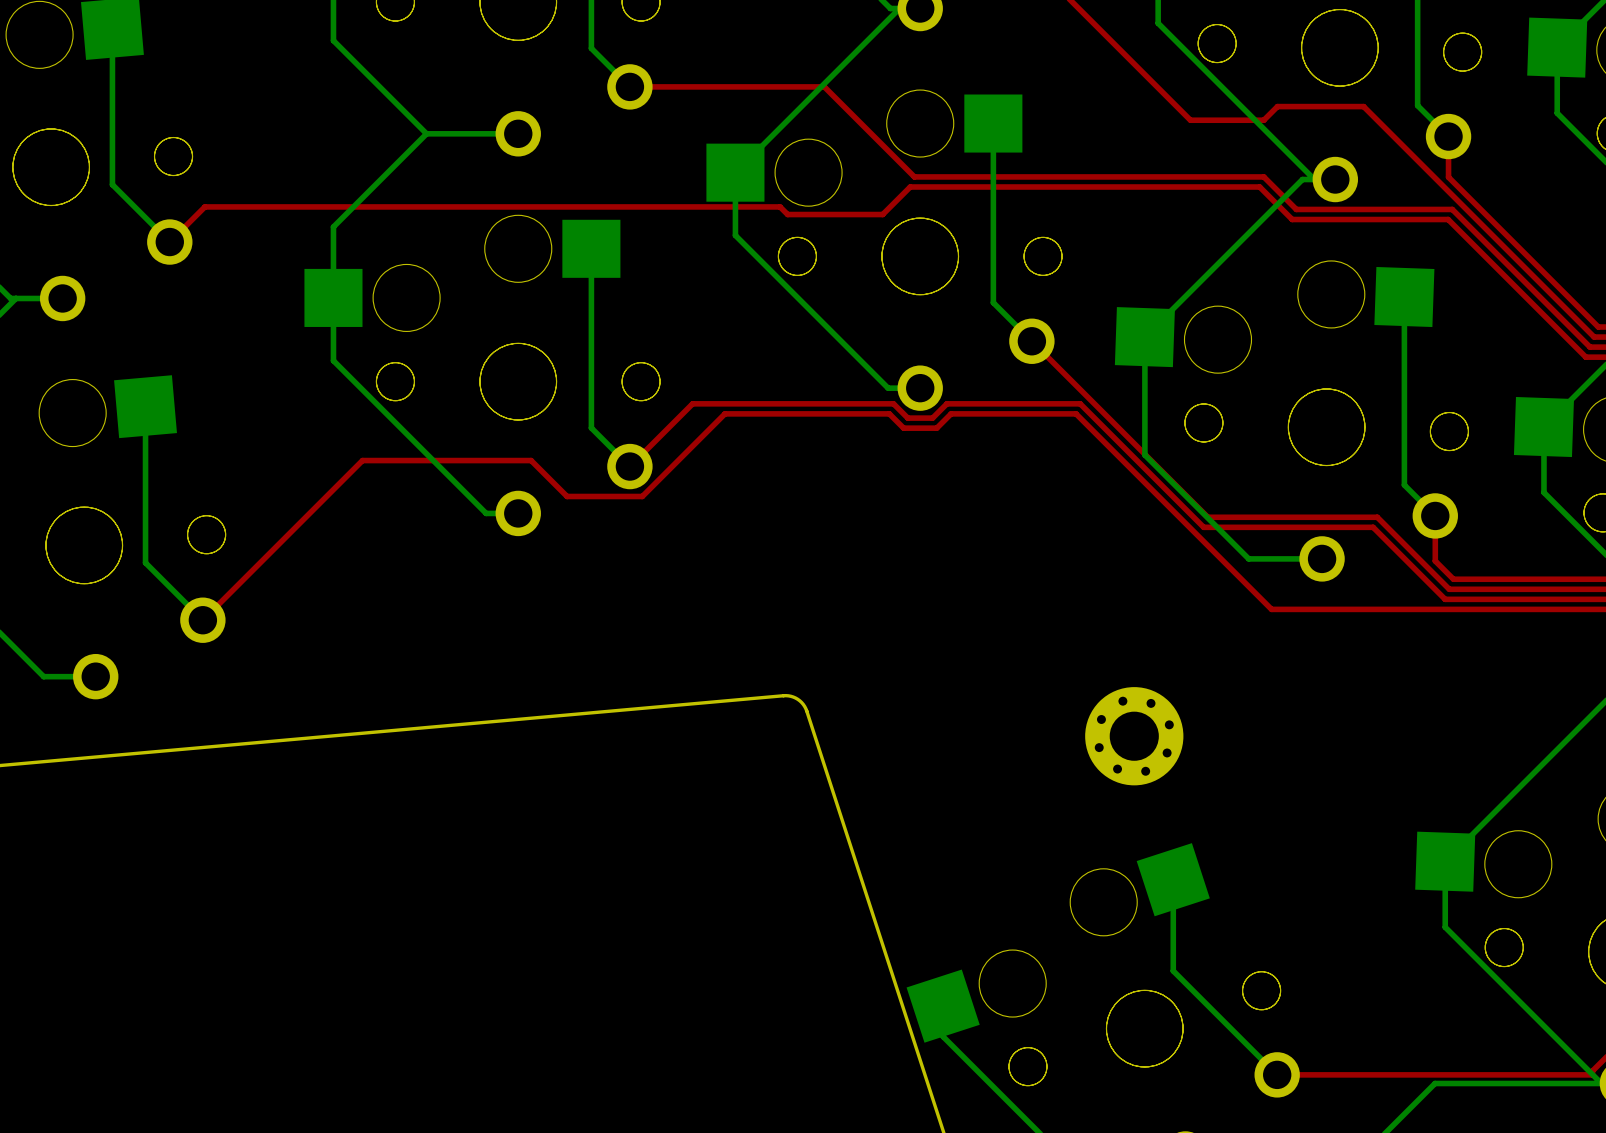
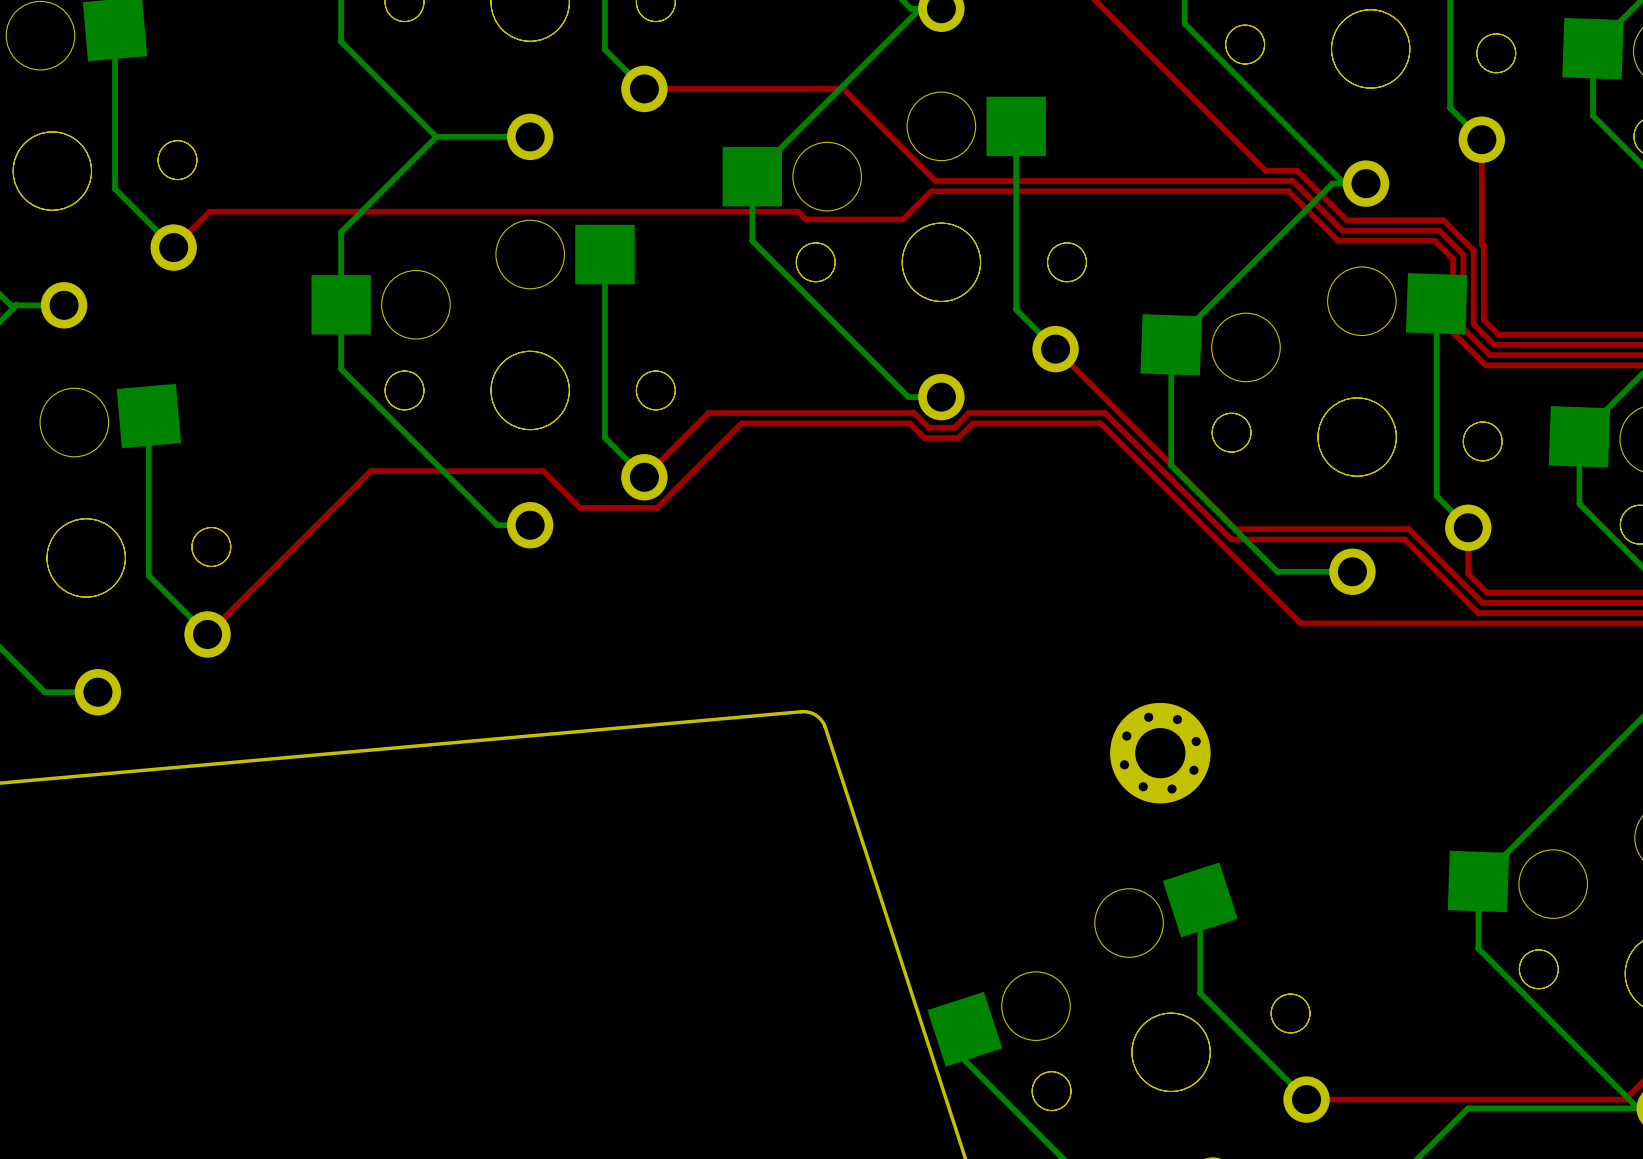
top track: (1190, 120) (1263, 120) (1277, 106) (1363, 106) (1594, 337) -> (1217, 122) (1265, 170) (1297, 170) (1346, 220) (1443, 220) (1473, 250) (1473, 324) (1494, 344) (1630, 344)
top track: (1448, 177) (1598, 327) -> (1481, 181) (1483, 319) (1498, 334) (1635, 334)
top track: (1296, 209) (1452, 209) (1589, 347) -> (1326, 214) (1342, 230) (1439, 230) (1463, 254) (1463, 328) (1489, 355) (1626, 355)
top track: (1292, 219) (1448, 219) (1585, 357) -> (1321, 224) (1338, 240) (1435, 240) (1453, 258) (1453, 332) (1485, 365) (1622, 365)

